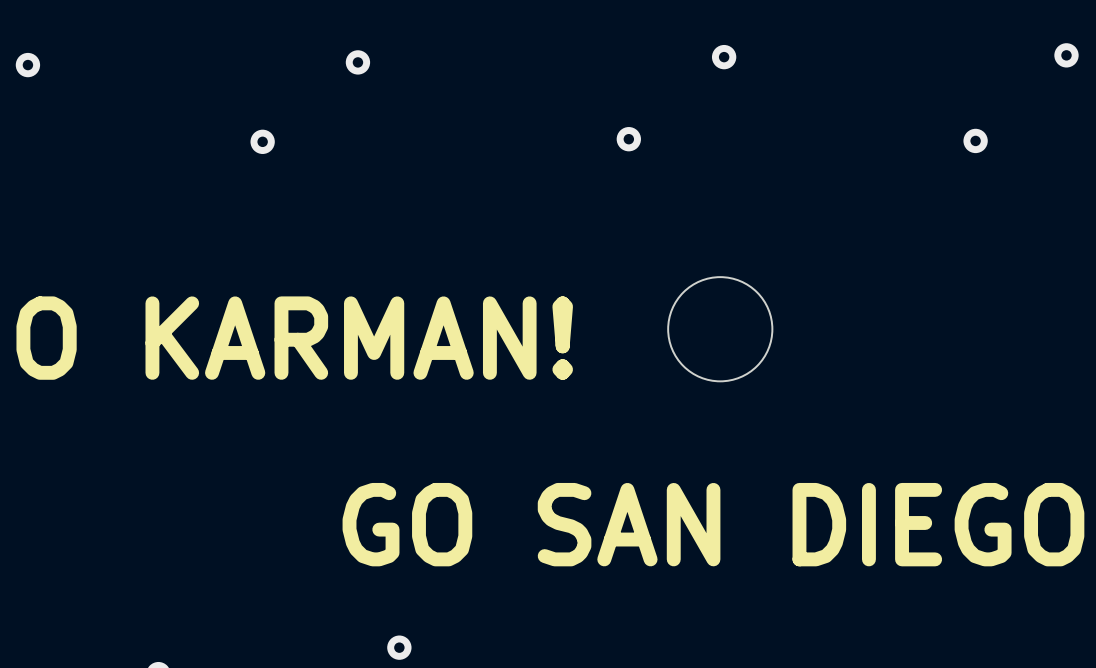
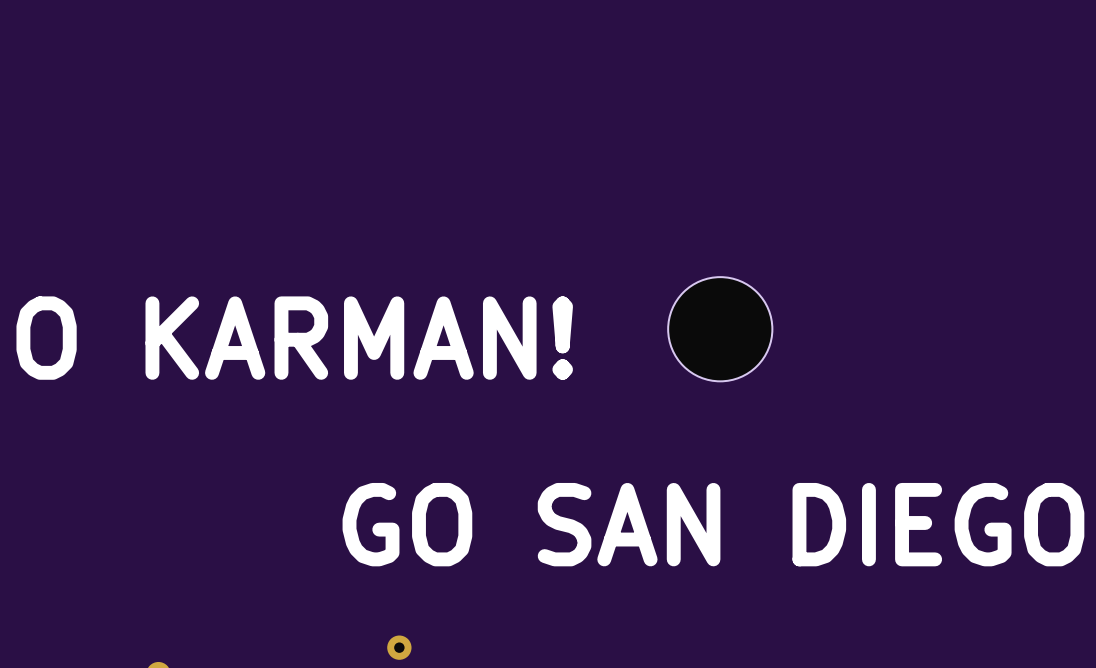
via: (1066, 55) -> none
via: (724, 57) -> none
via: (357, 62) -> none
via: (27, 65) -> none
via: (628, 139) -> none
via: (975, 140) -> none
via: (262, 141) -> none

